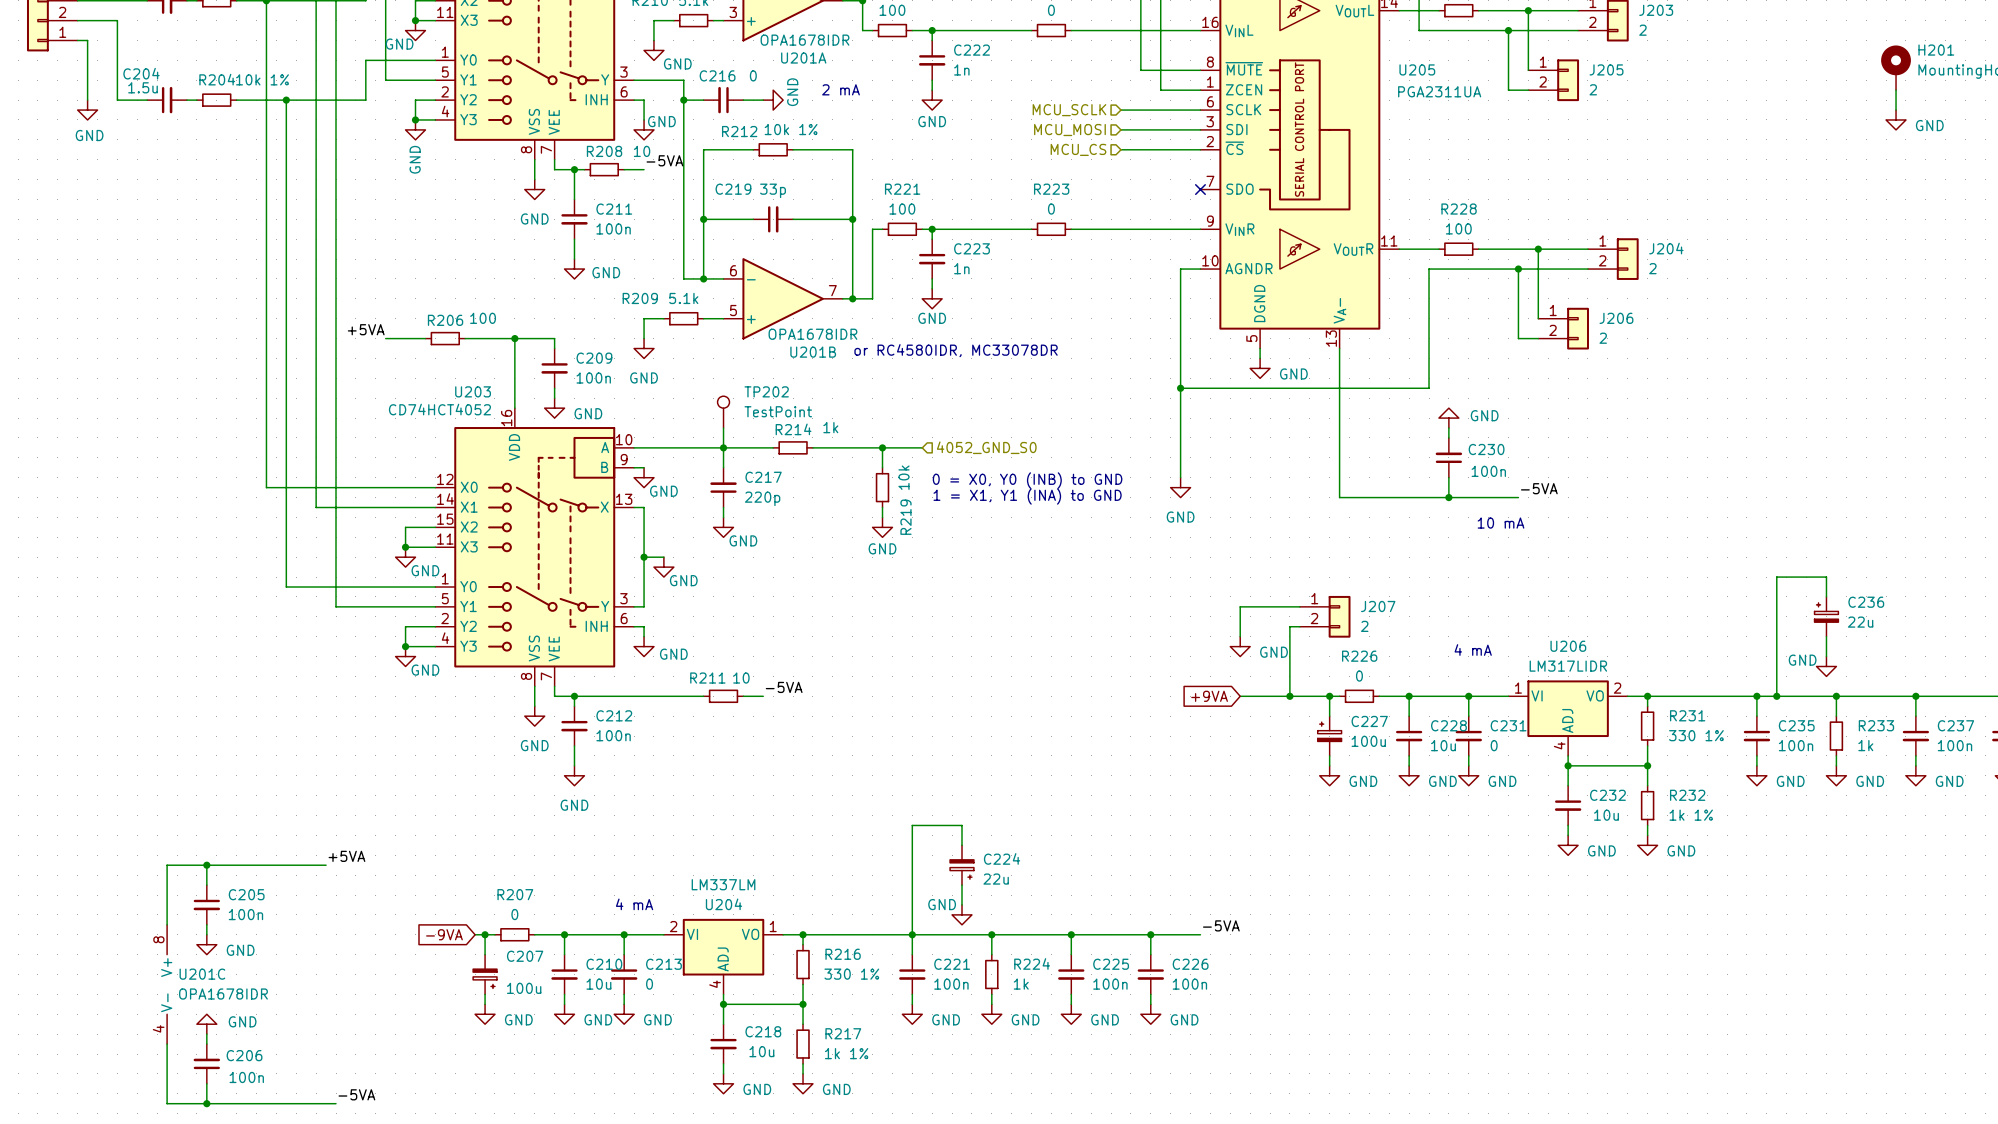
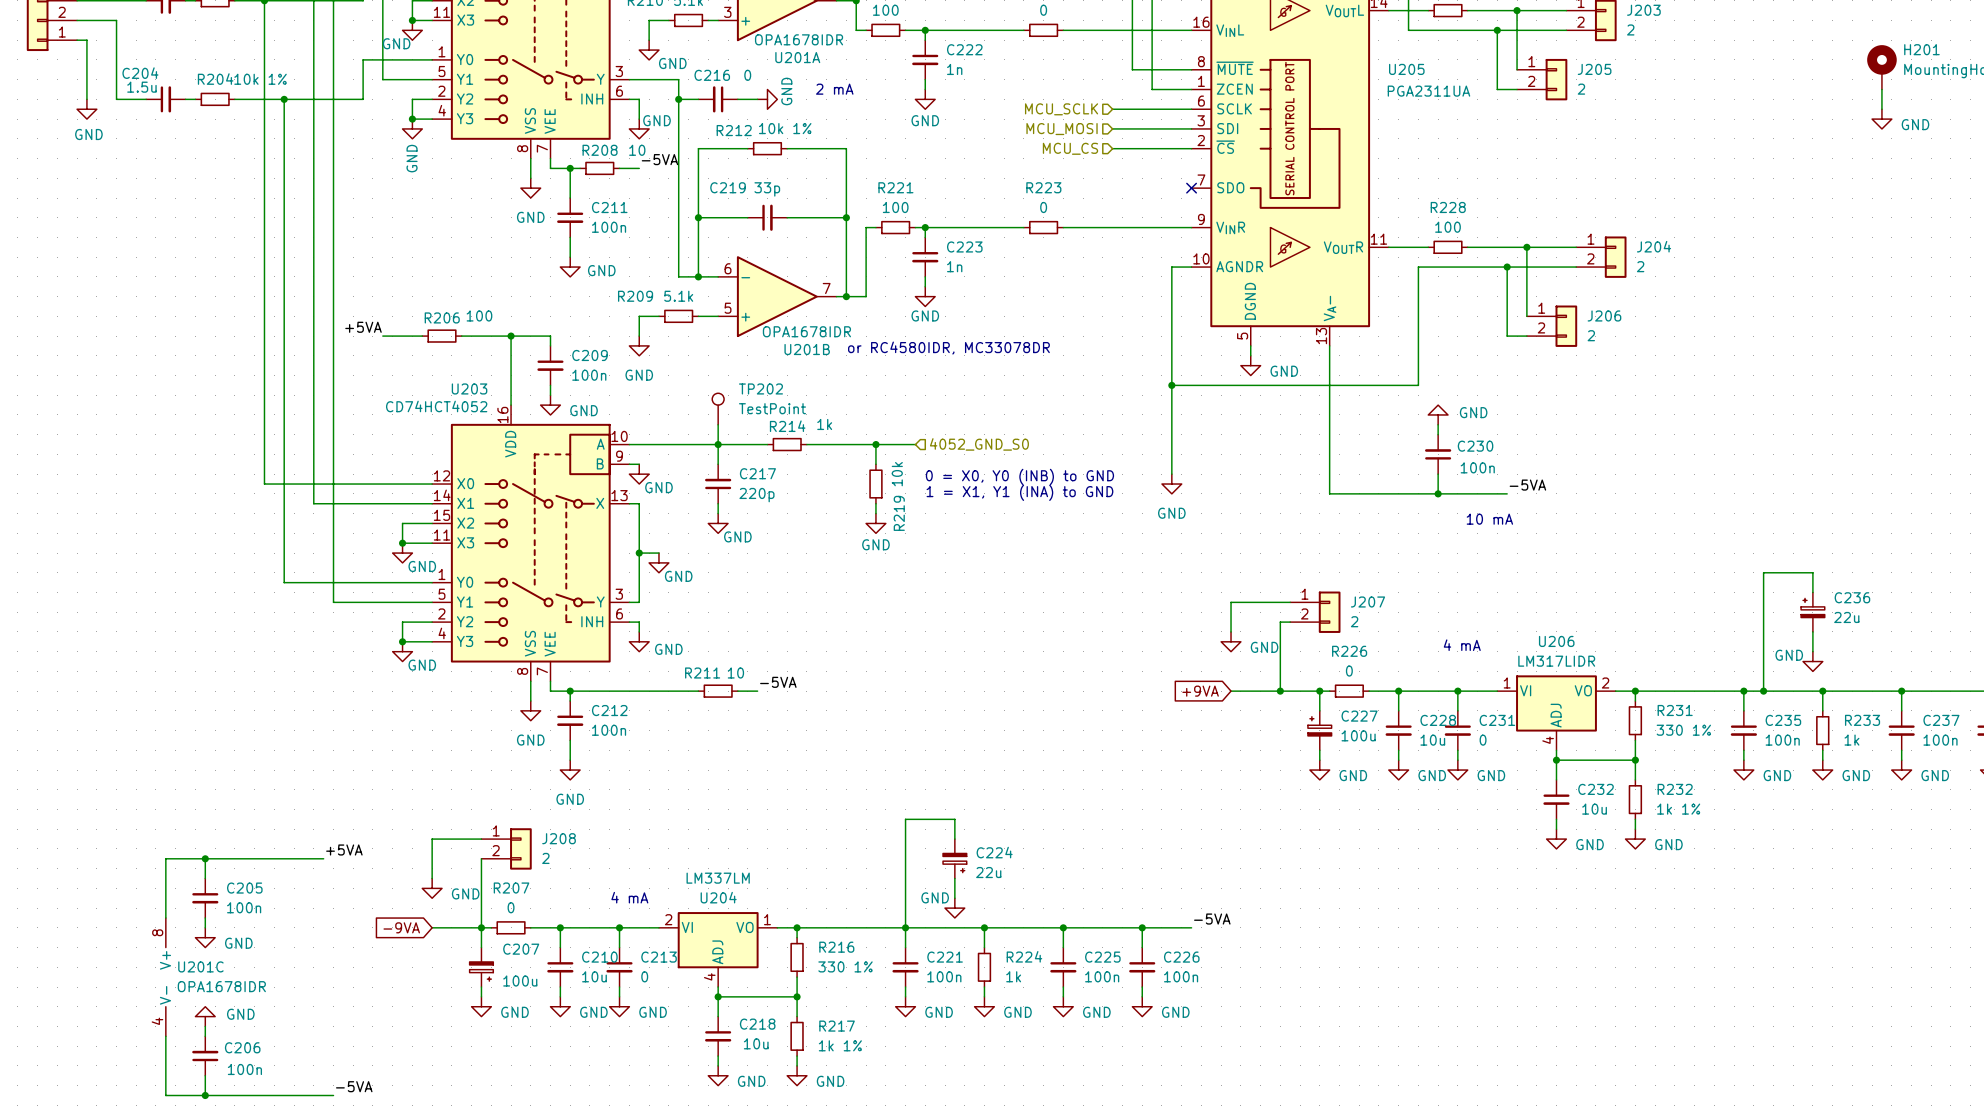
wire: none -> (481, 839) (432, 839) (432, 878)
J208: none -> 2 (506, 848)
wire: none -> (481, 858) (481, 927)
power symbol: none -> GND (432, 888)
wire: none -> (432, 927) (471, 927)
global label position: -9VA (444, 934) -> -9VA (401, 927)

